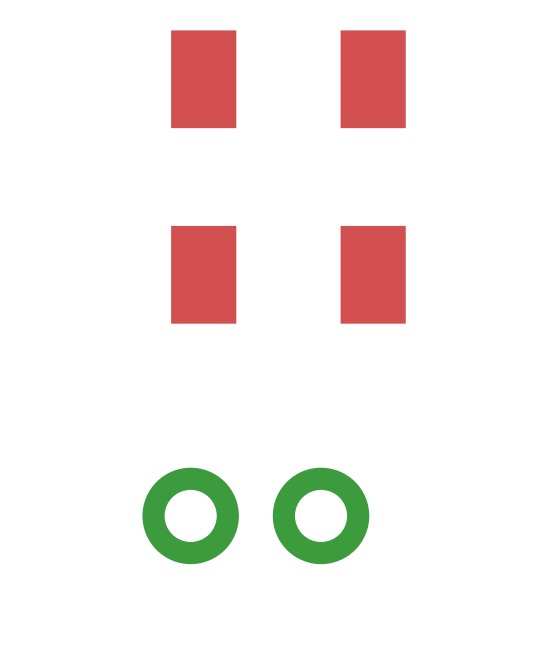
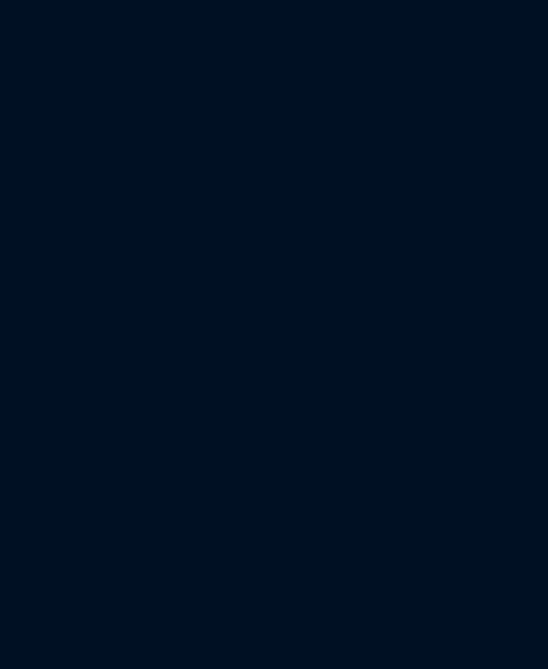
part: (288, 79) -> none
part: (288, 274) -> none
part: (255, 515) -> none

